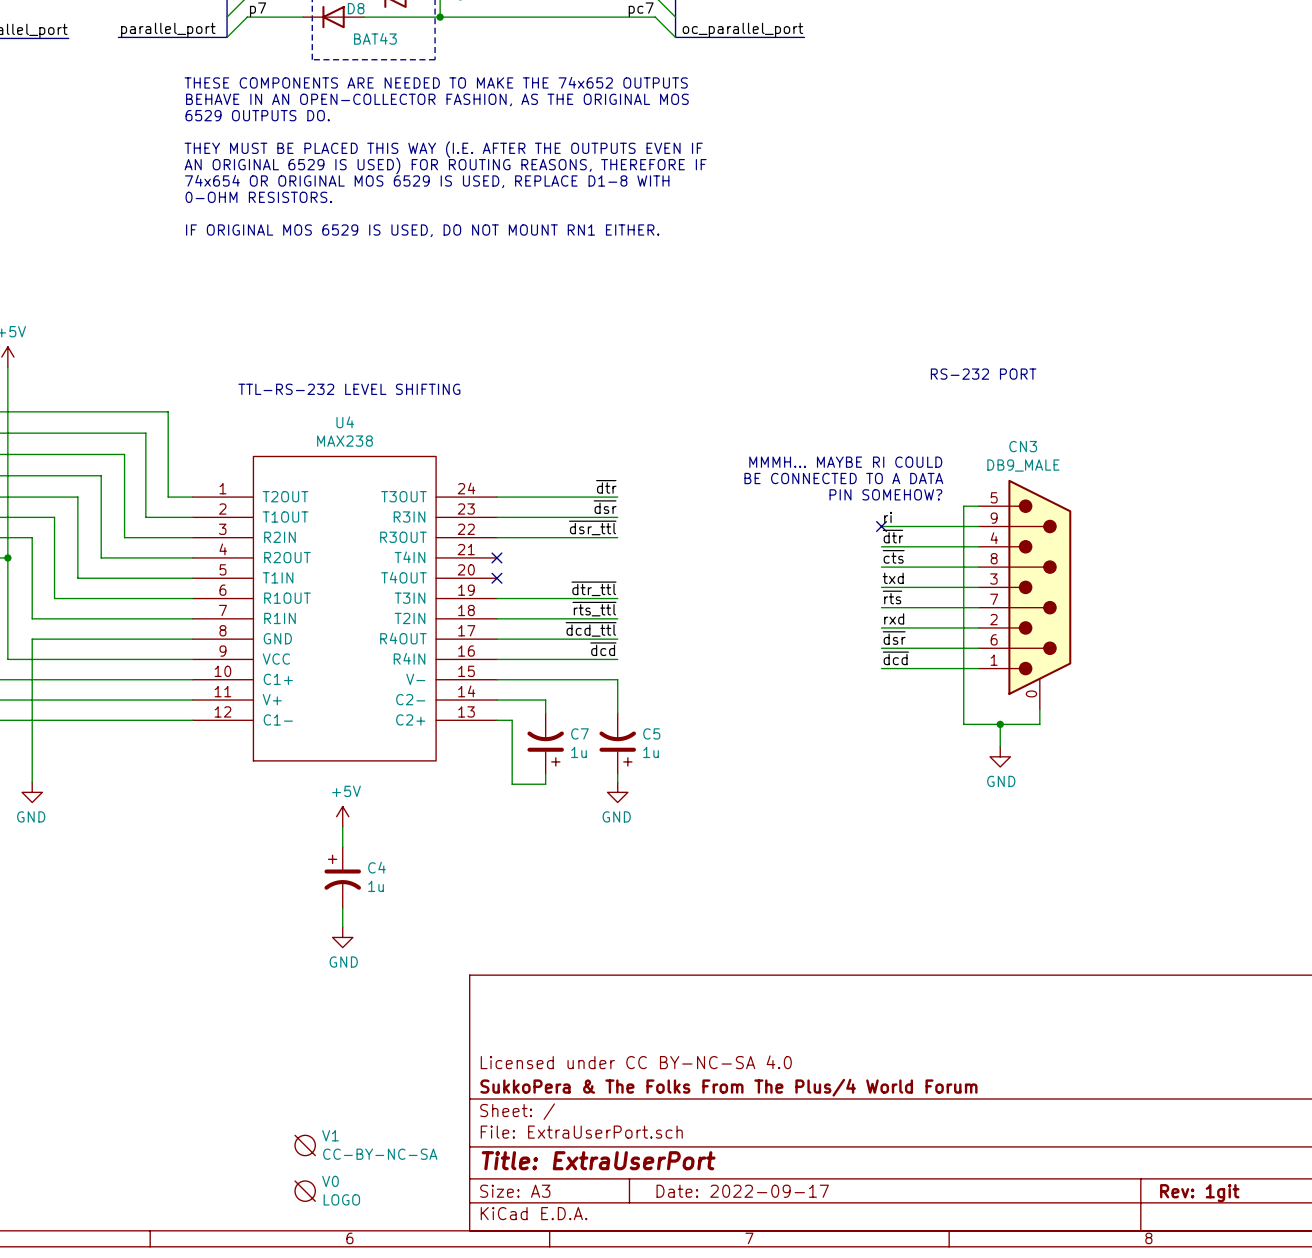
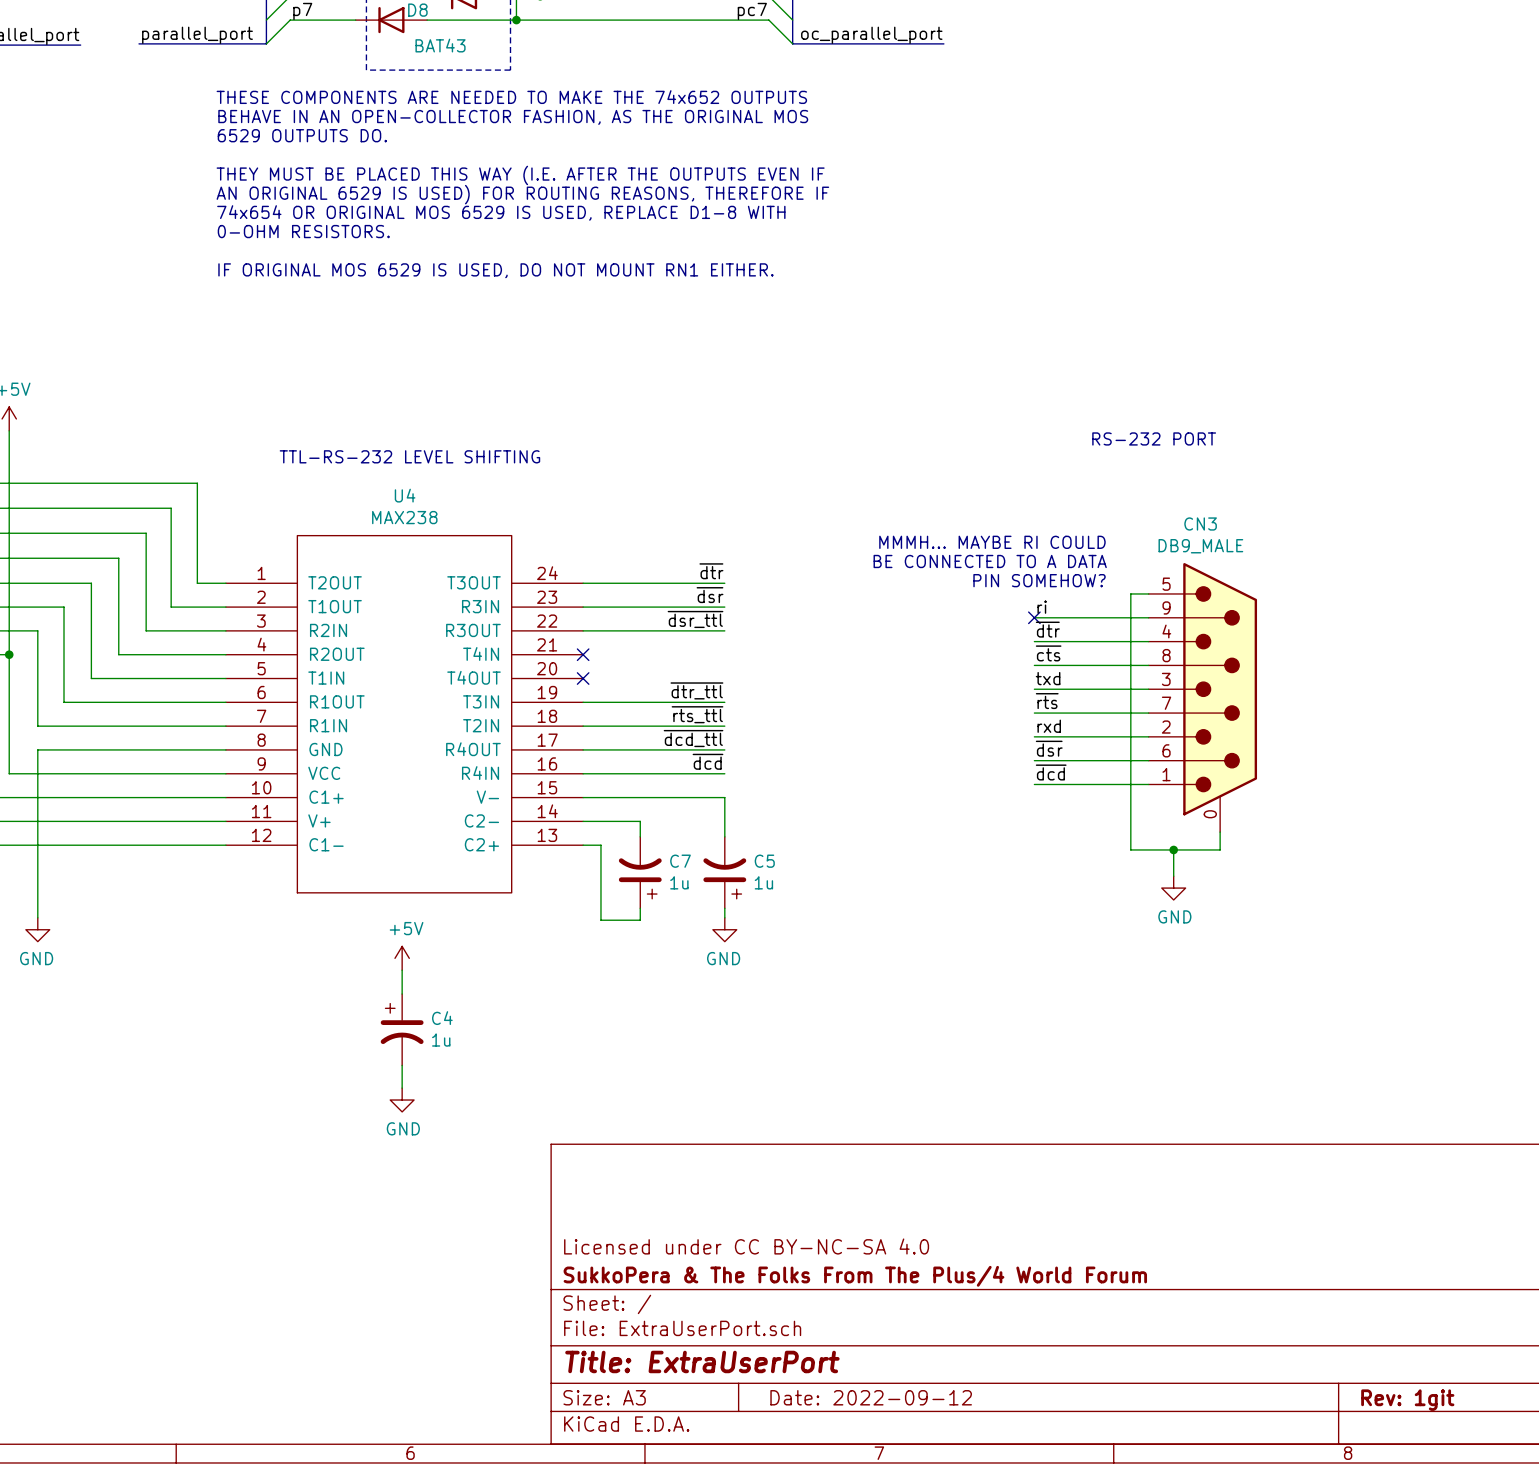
V1: CC-BY-NC-SA (305, 1145) -> none
V0: LOGO (305, 1191) -> none
title block: Date: 2022-09-17 (742, 1191) -> Date: 2022-09-12 (871, 1397)

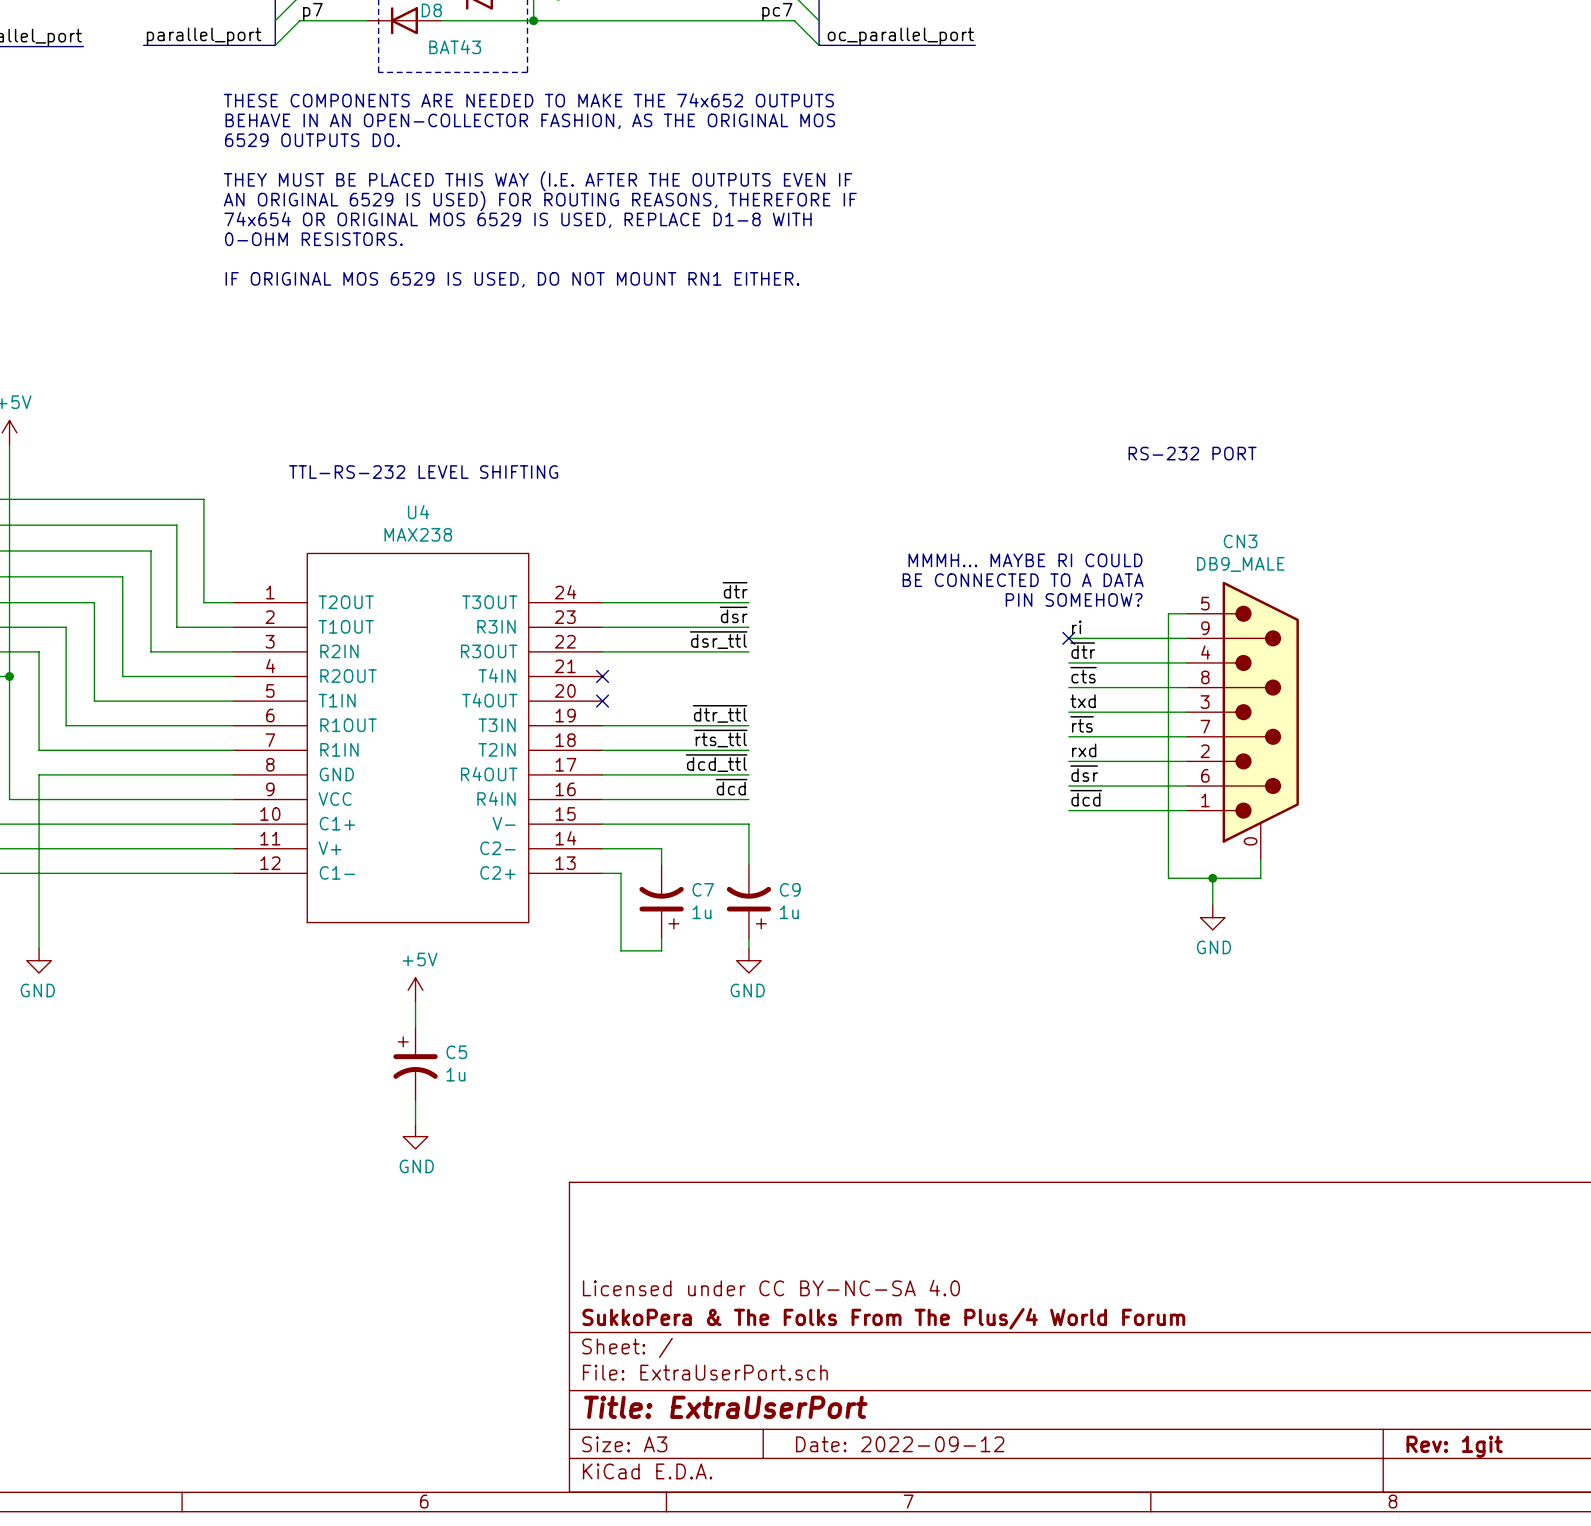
C5 name: C5 (764, 861) -> C9 (790, 889)
C4 name: C4 (442, 1018) -> C5 (456, 1052)

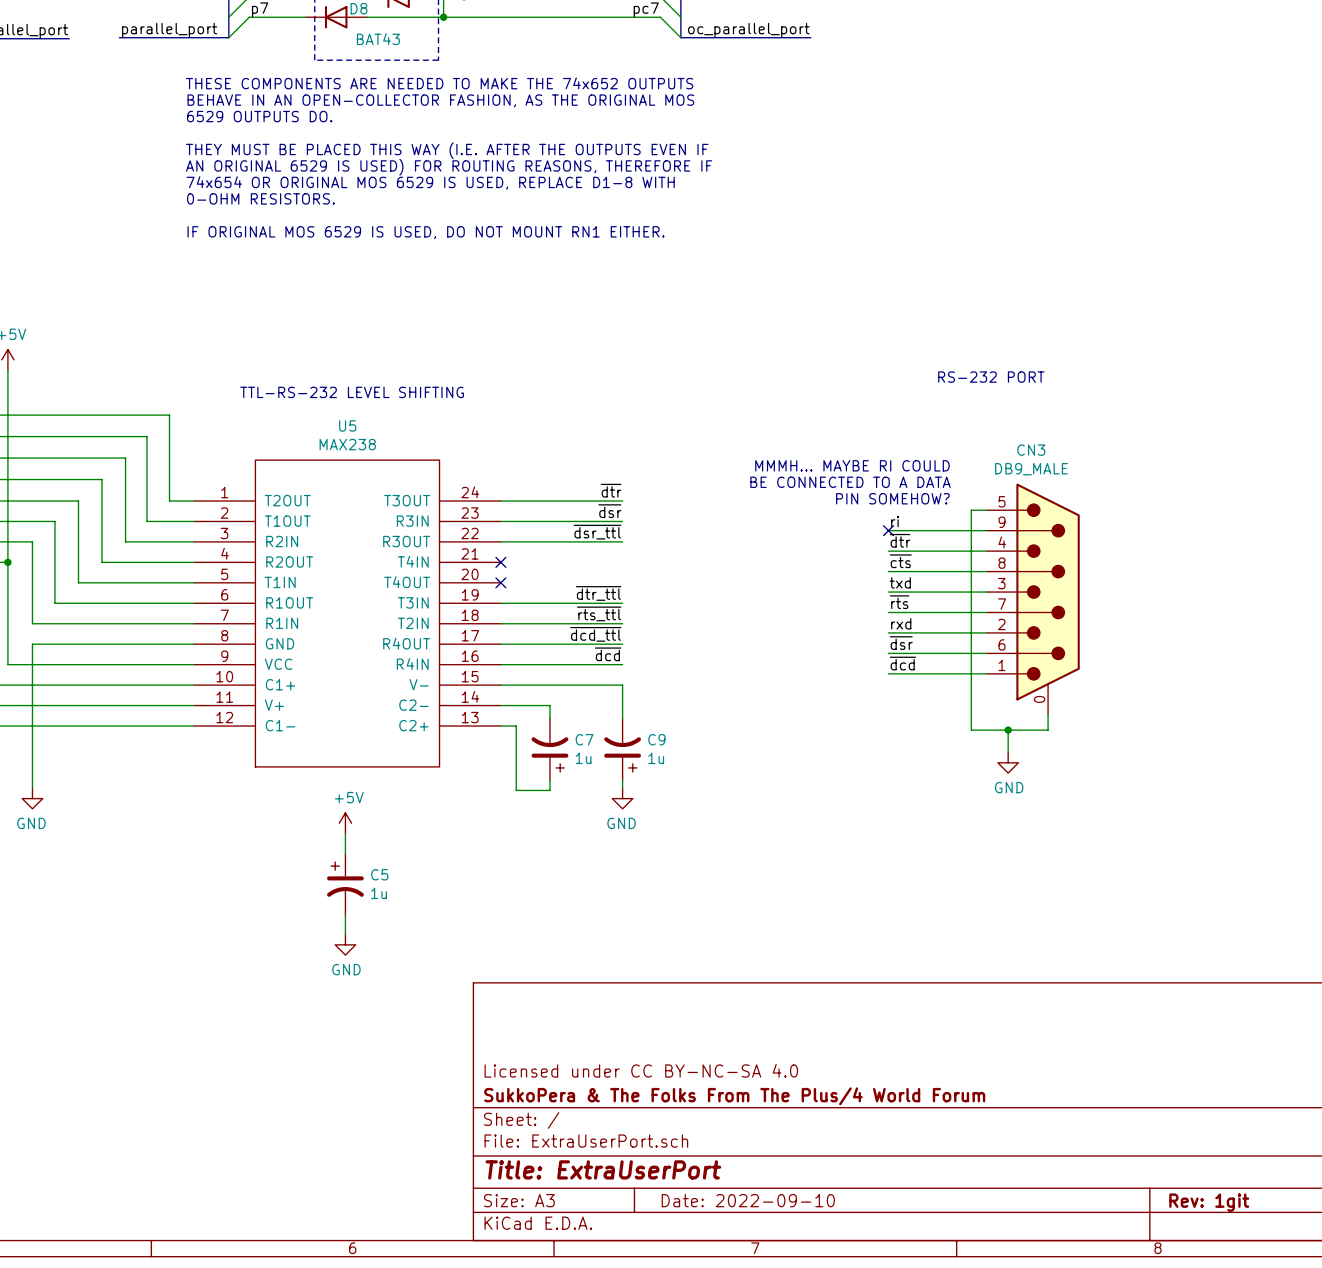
U4 name: U4 (418, 512) -> U5 (347, 425)
title block: Date: 2022-09-12 (900, 1444) -> Date: 2022-09-10 (748, 1200)

